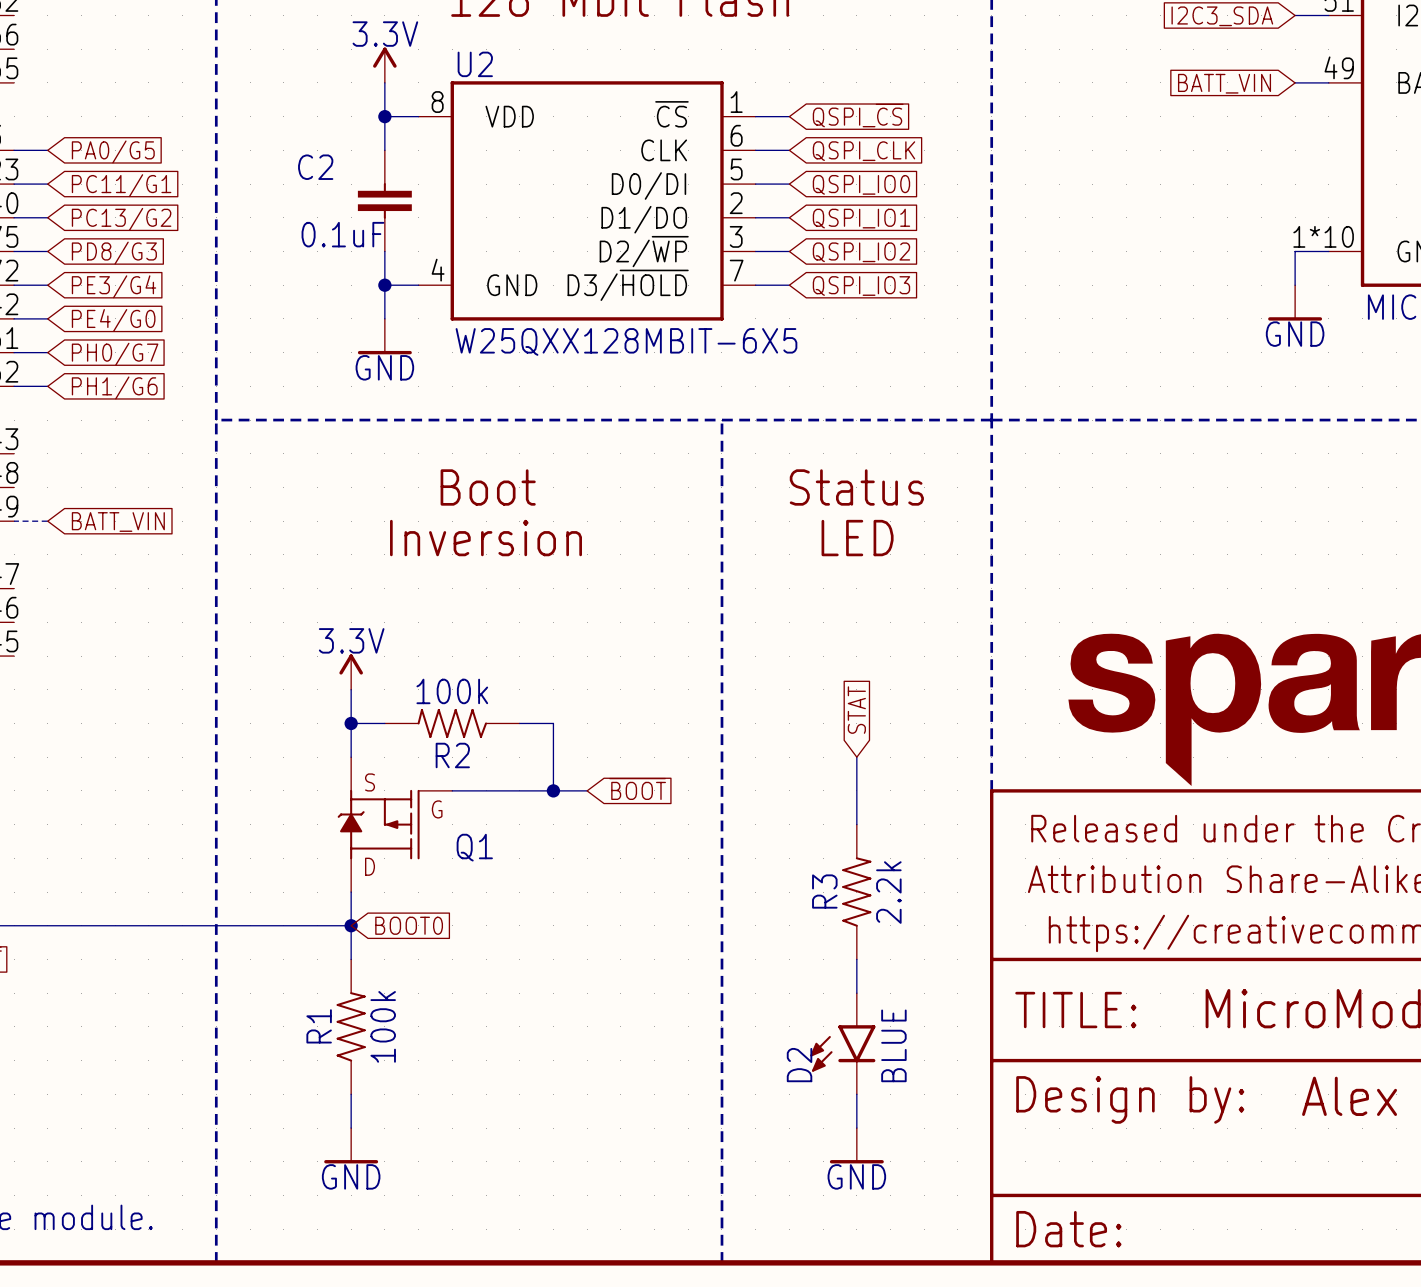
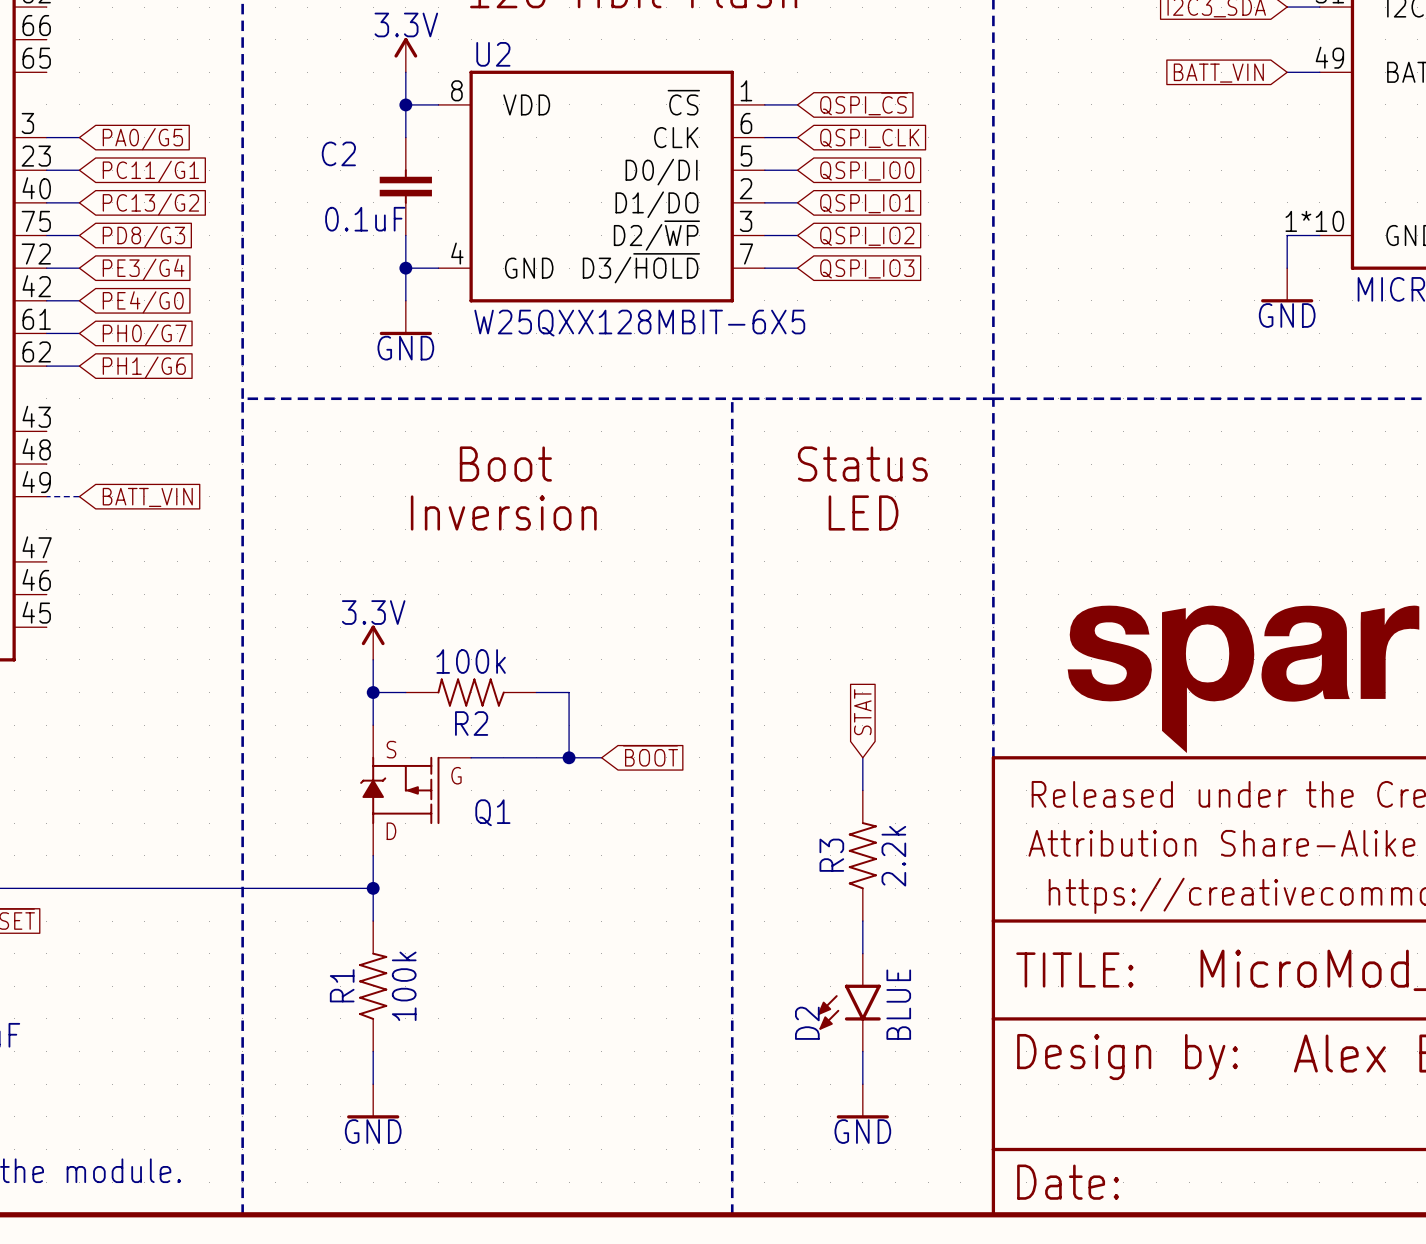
global label position: STAT (856, 710) -> STAT (862, 712)
wire: (856, 757) (856, 790) -> none
global label: BOOT0 (409, 925) -> none

